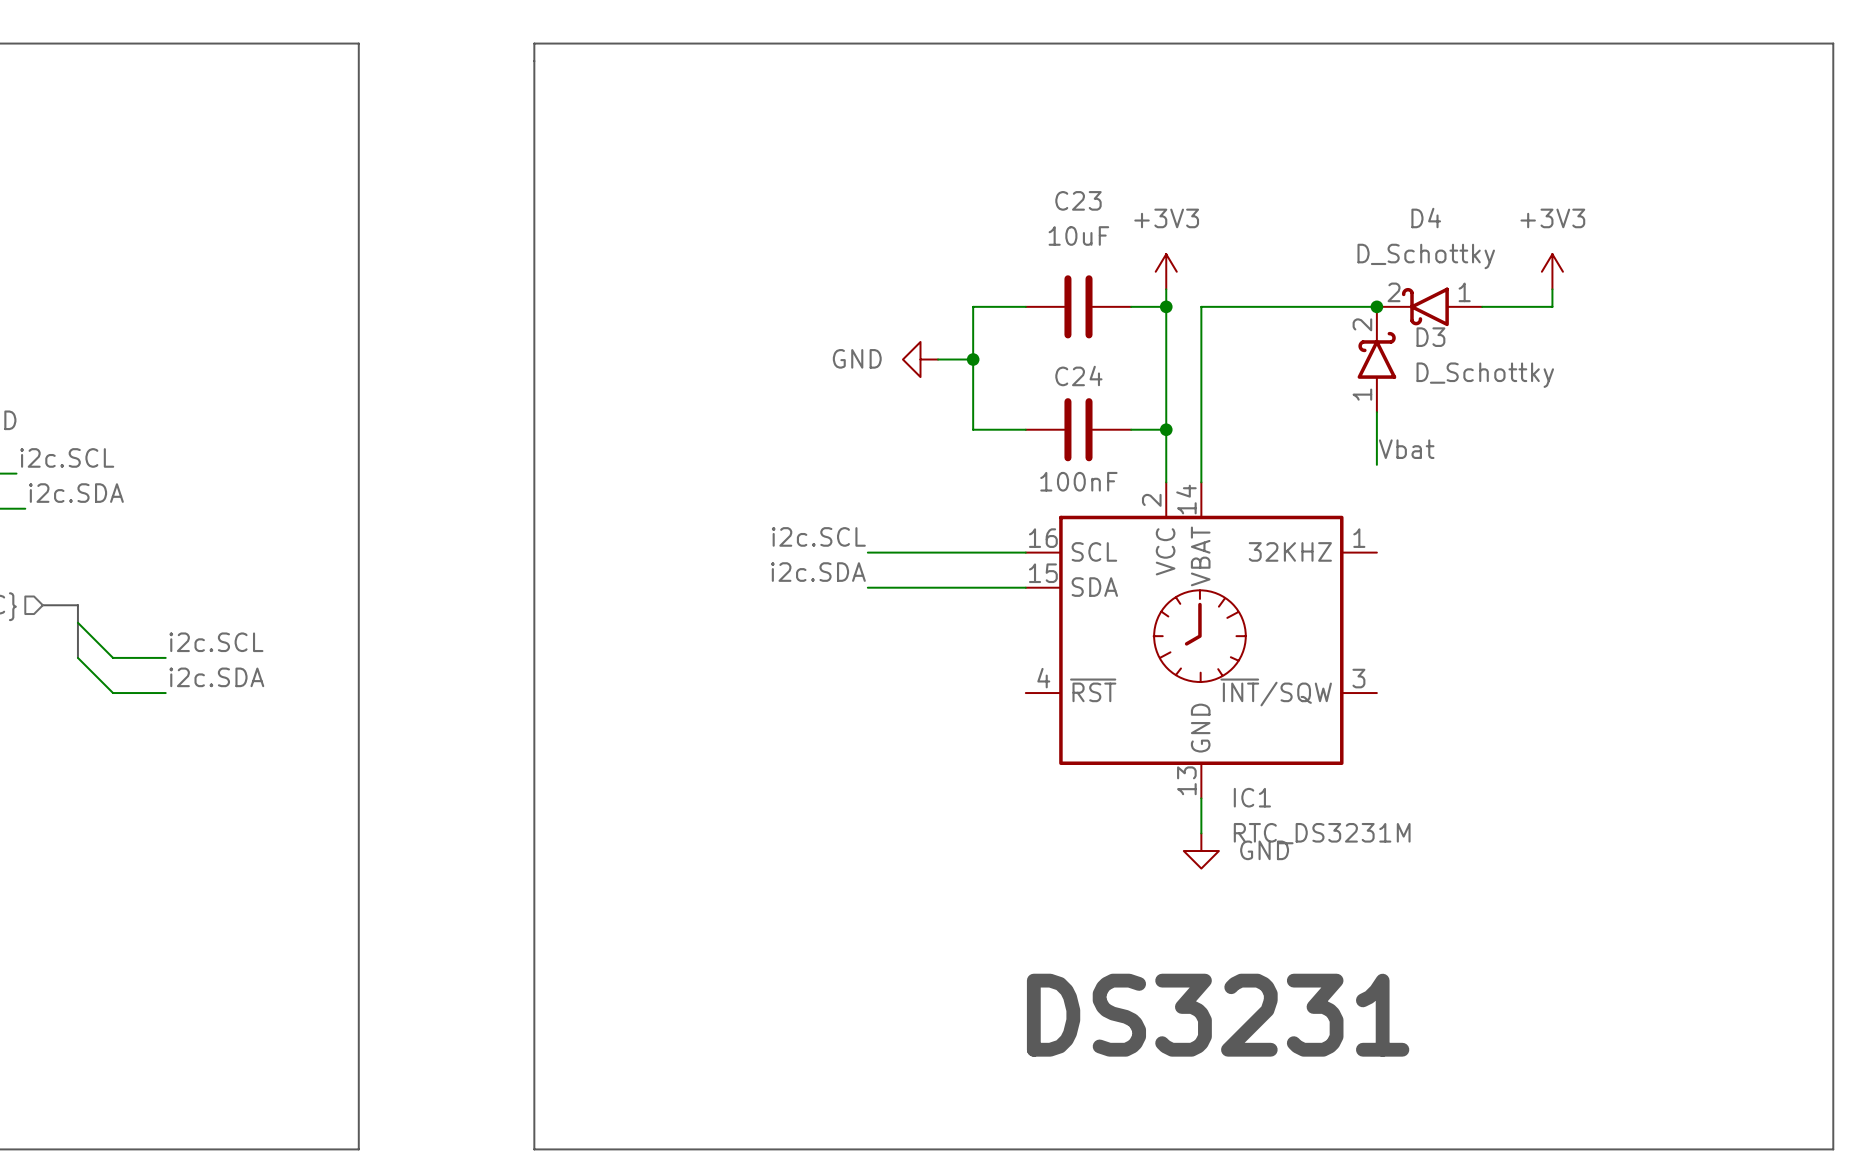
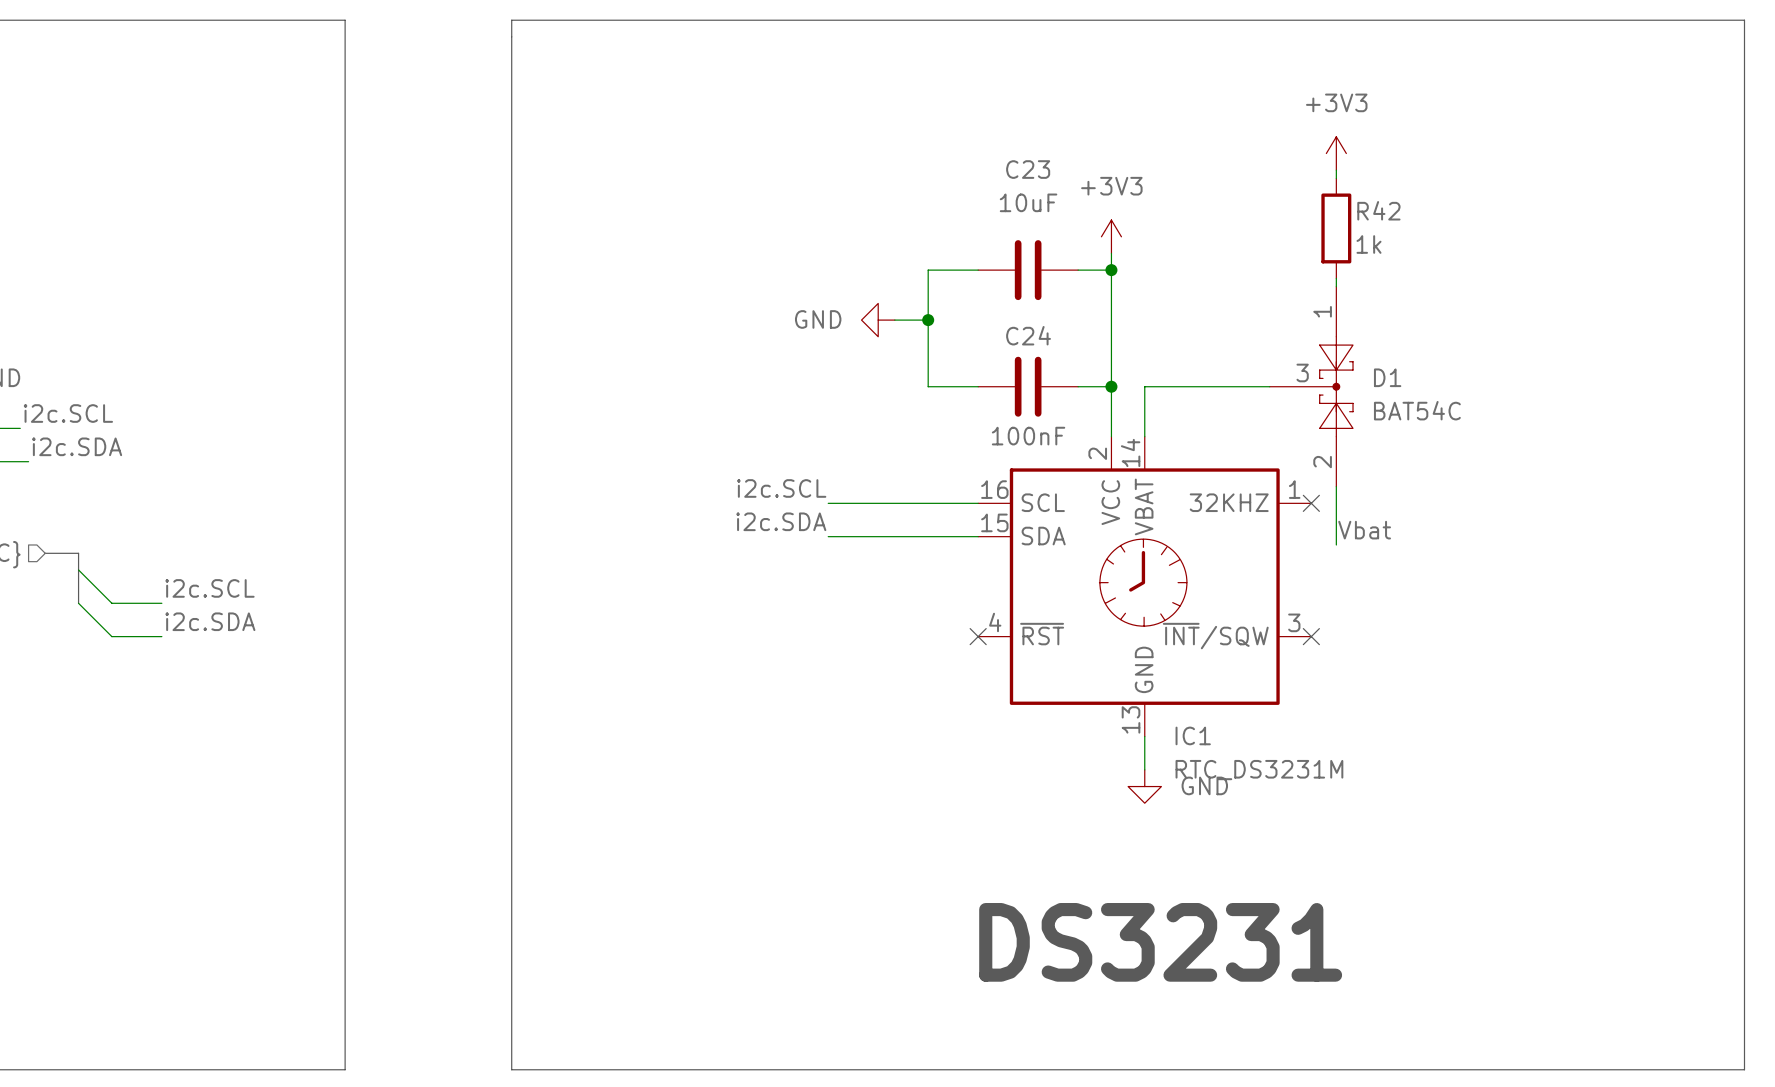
wire: none -> (1336, 170) (1336, 178)
R42: none -> 1k (1336, 228)
power symbol position: +3V3 (1552, 271) -> +3V3 (1336, 153)
wire: (1552, 289) (1552, 306) (1482, 306) -> none
wire: (1376, 306) (1201, 306) (1201, 429) -> (1269, 386) (1144, 386)
junction: (1376, 306) -> none
D4: D_Schottky (1429, 306) -> none
wire: none -> (1336, 278) (1336, 286)
D3: D_Schottky (1376, 359) -> none
wire: (1376, 412) (1376, 464) -> none
D1: none -> BAT54C (1311, 386)
label position: Vbat (1406, 449) -> Vbat (1364, 530)
wire: none -> (1336, 486) (1336, 544)
no-connect mark: none -> (1311, 503)
no-connect mark: none -> (978, 636)
no-connect mark: none -> (1311, 636)

